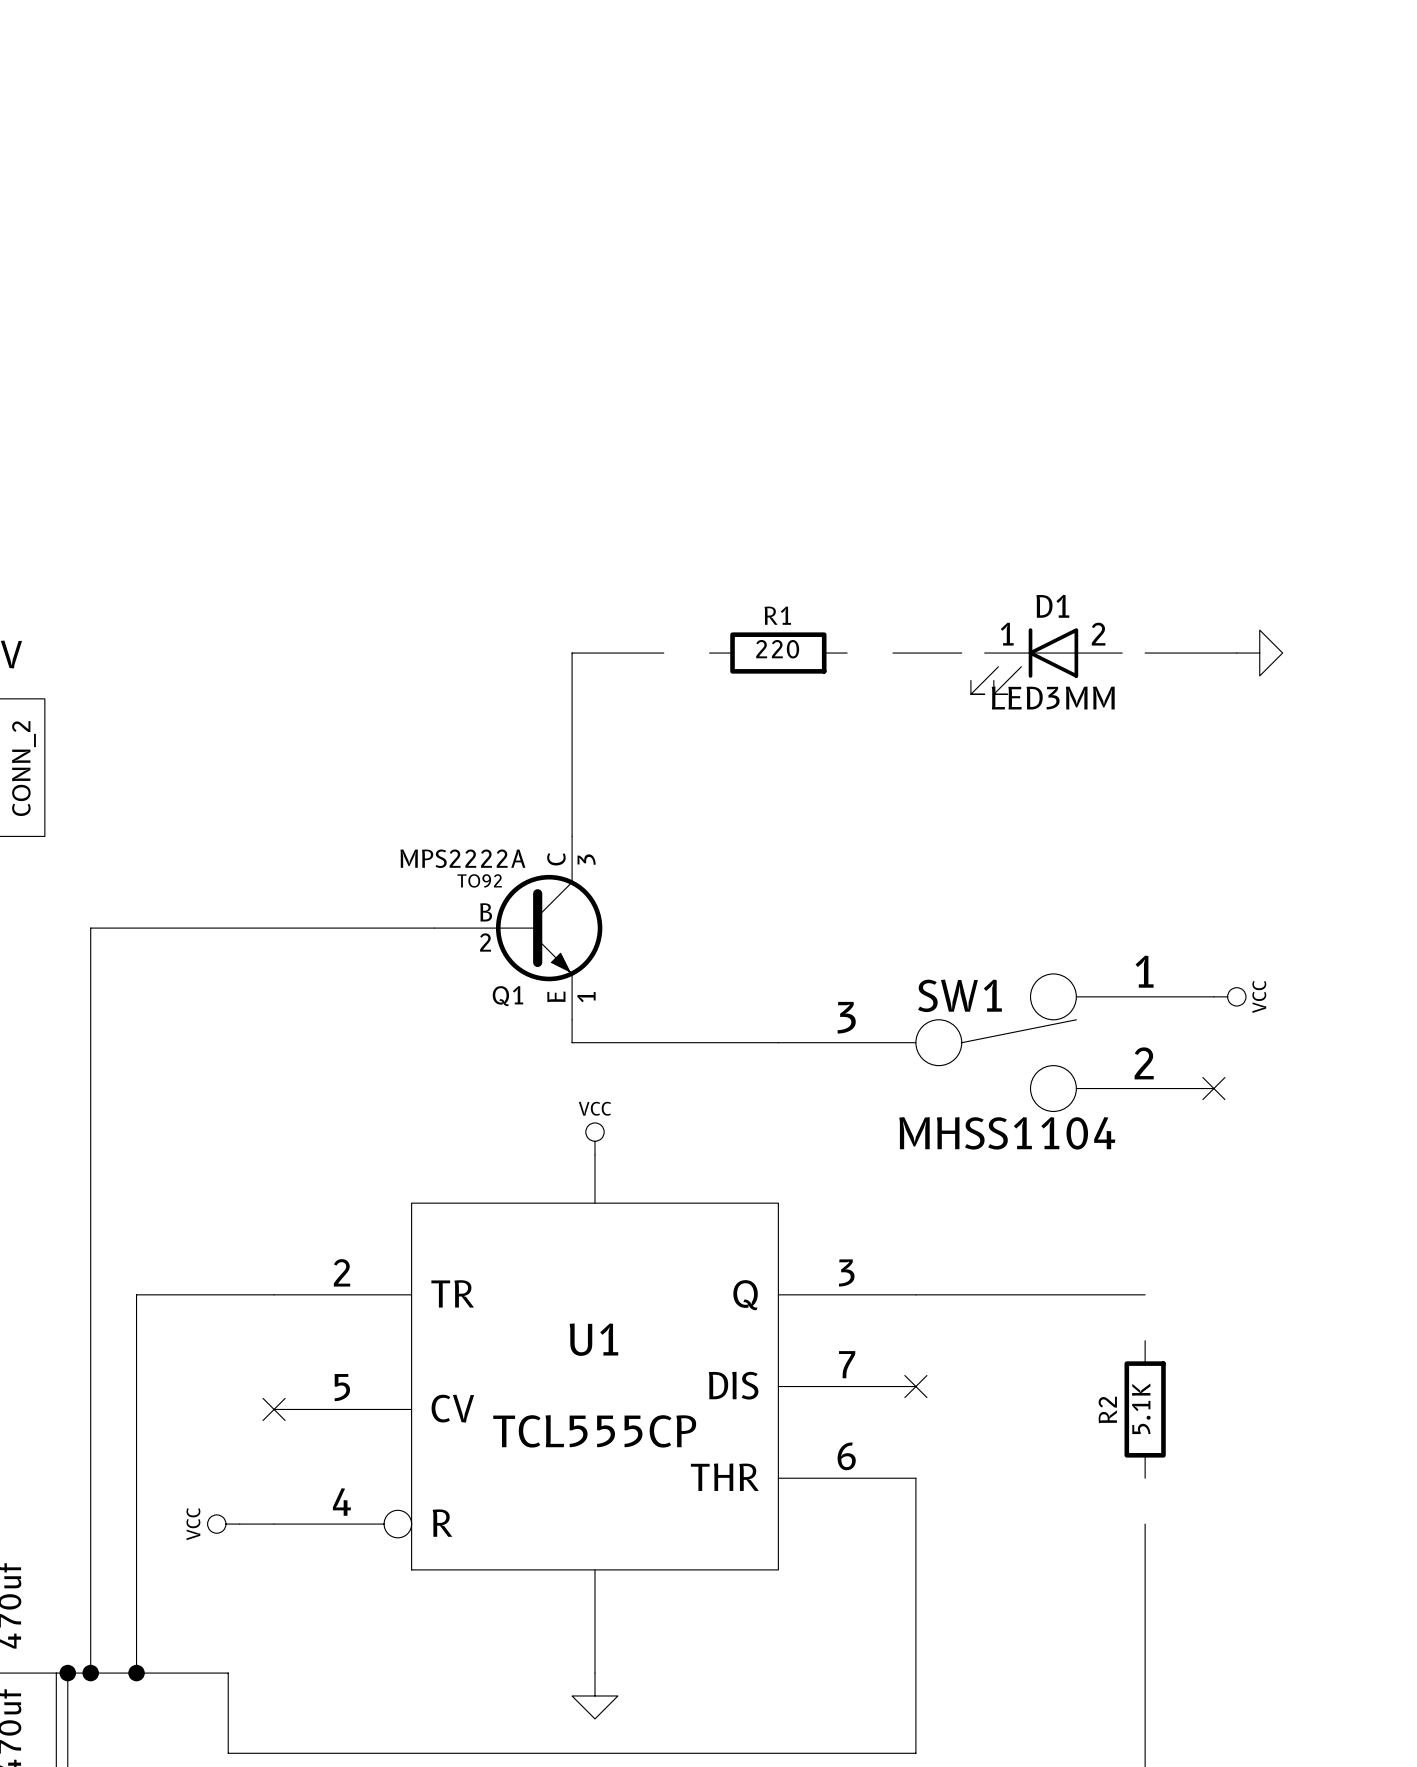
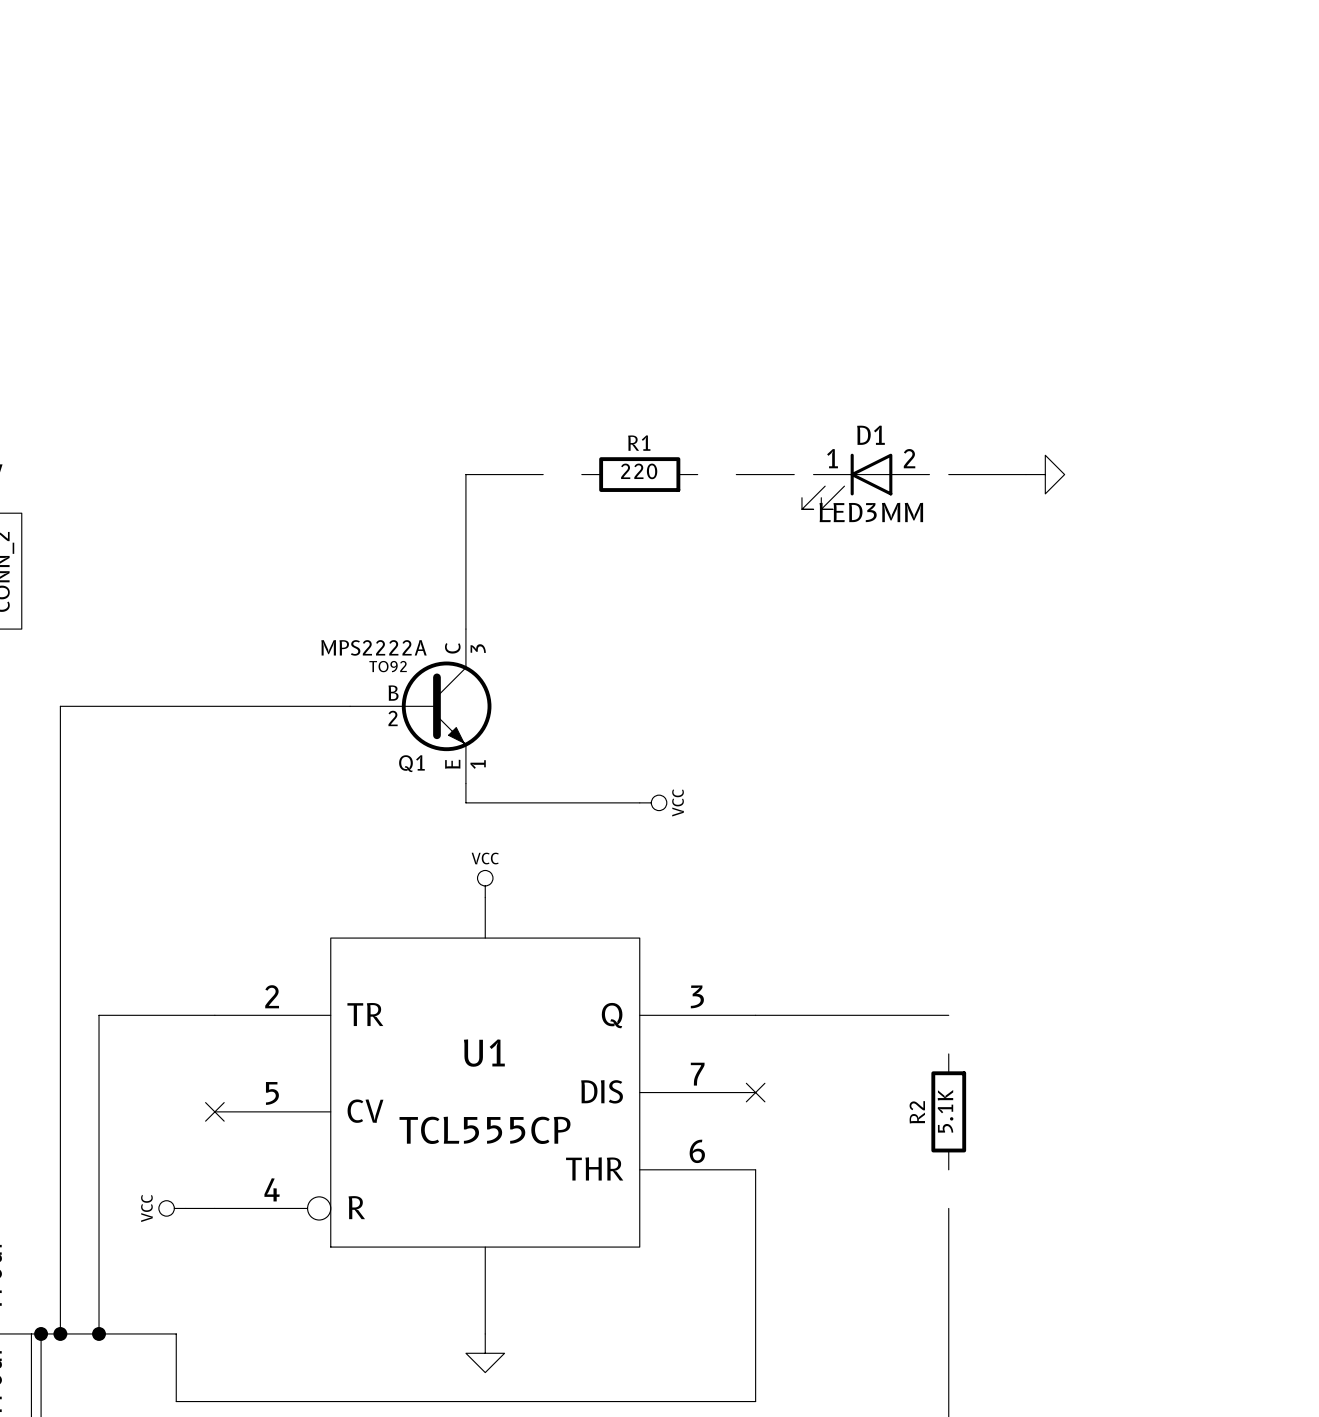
power symbol position: VCC (1229, 996) -> VCC (653, 802)
SW1: MHSS1104 (996, 1042) -> none
no-connect mark: (1213, 1088) -> none

